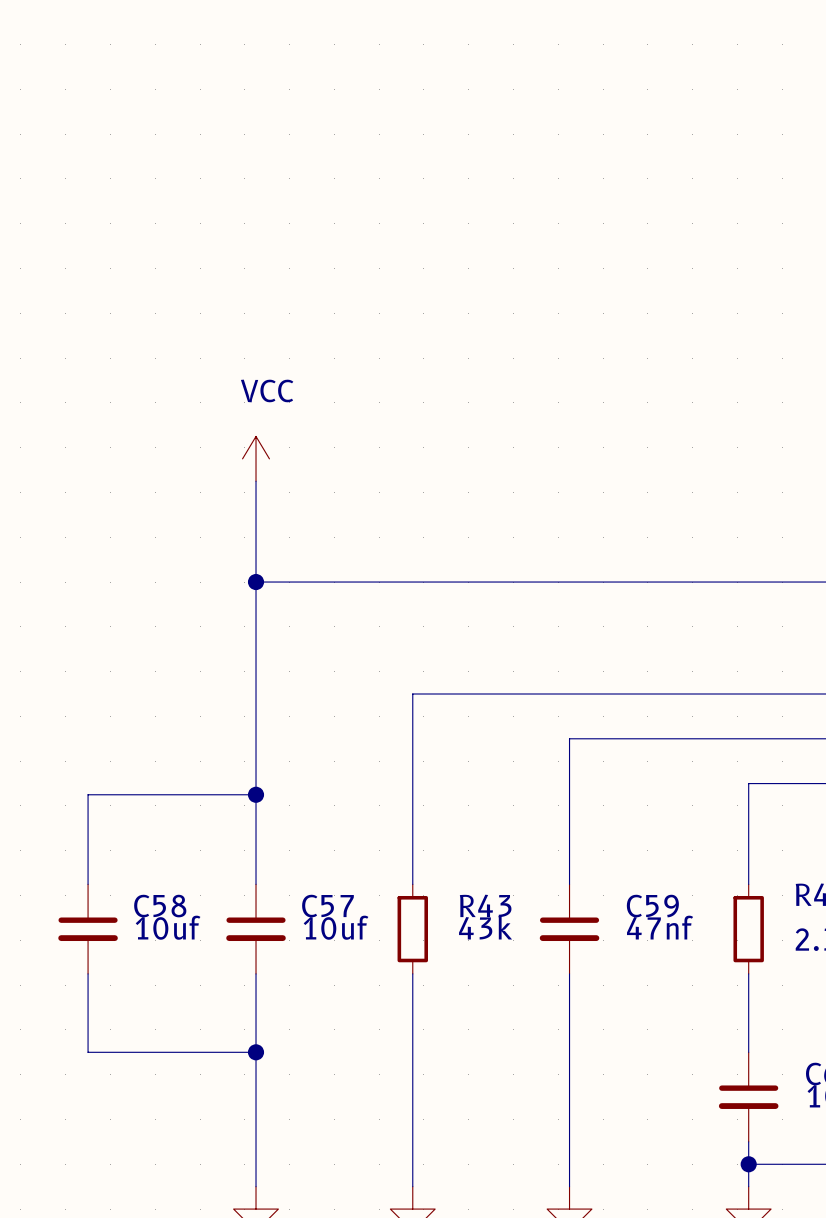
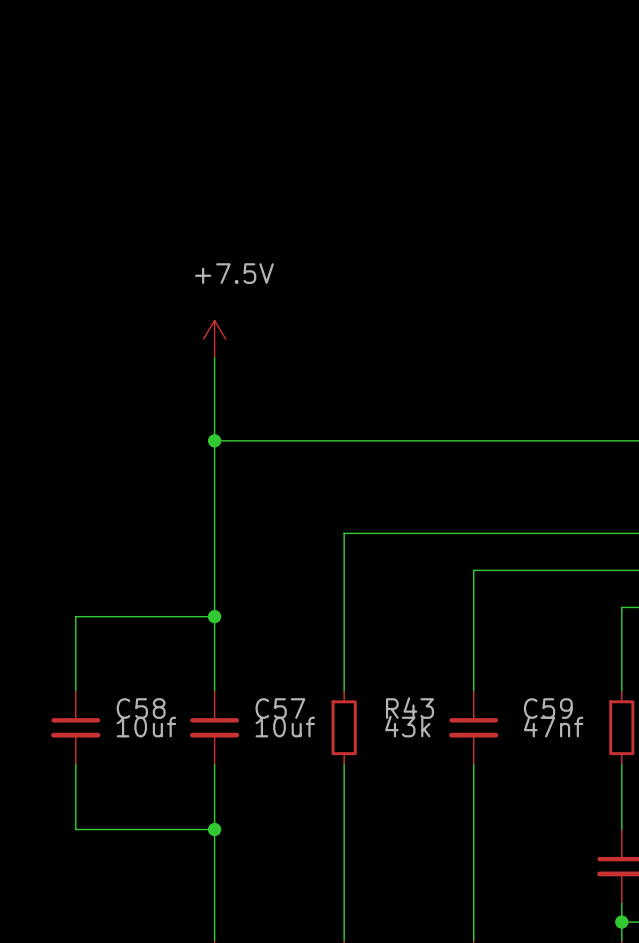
power symbol: VCC (256, 458) -> +7.5V (214, 339)

